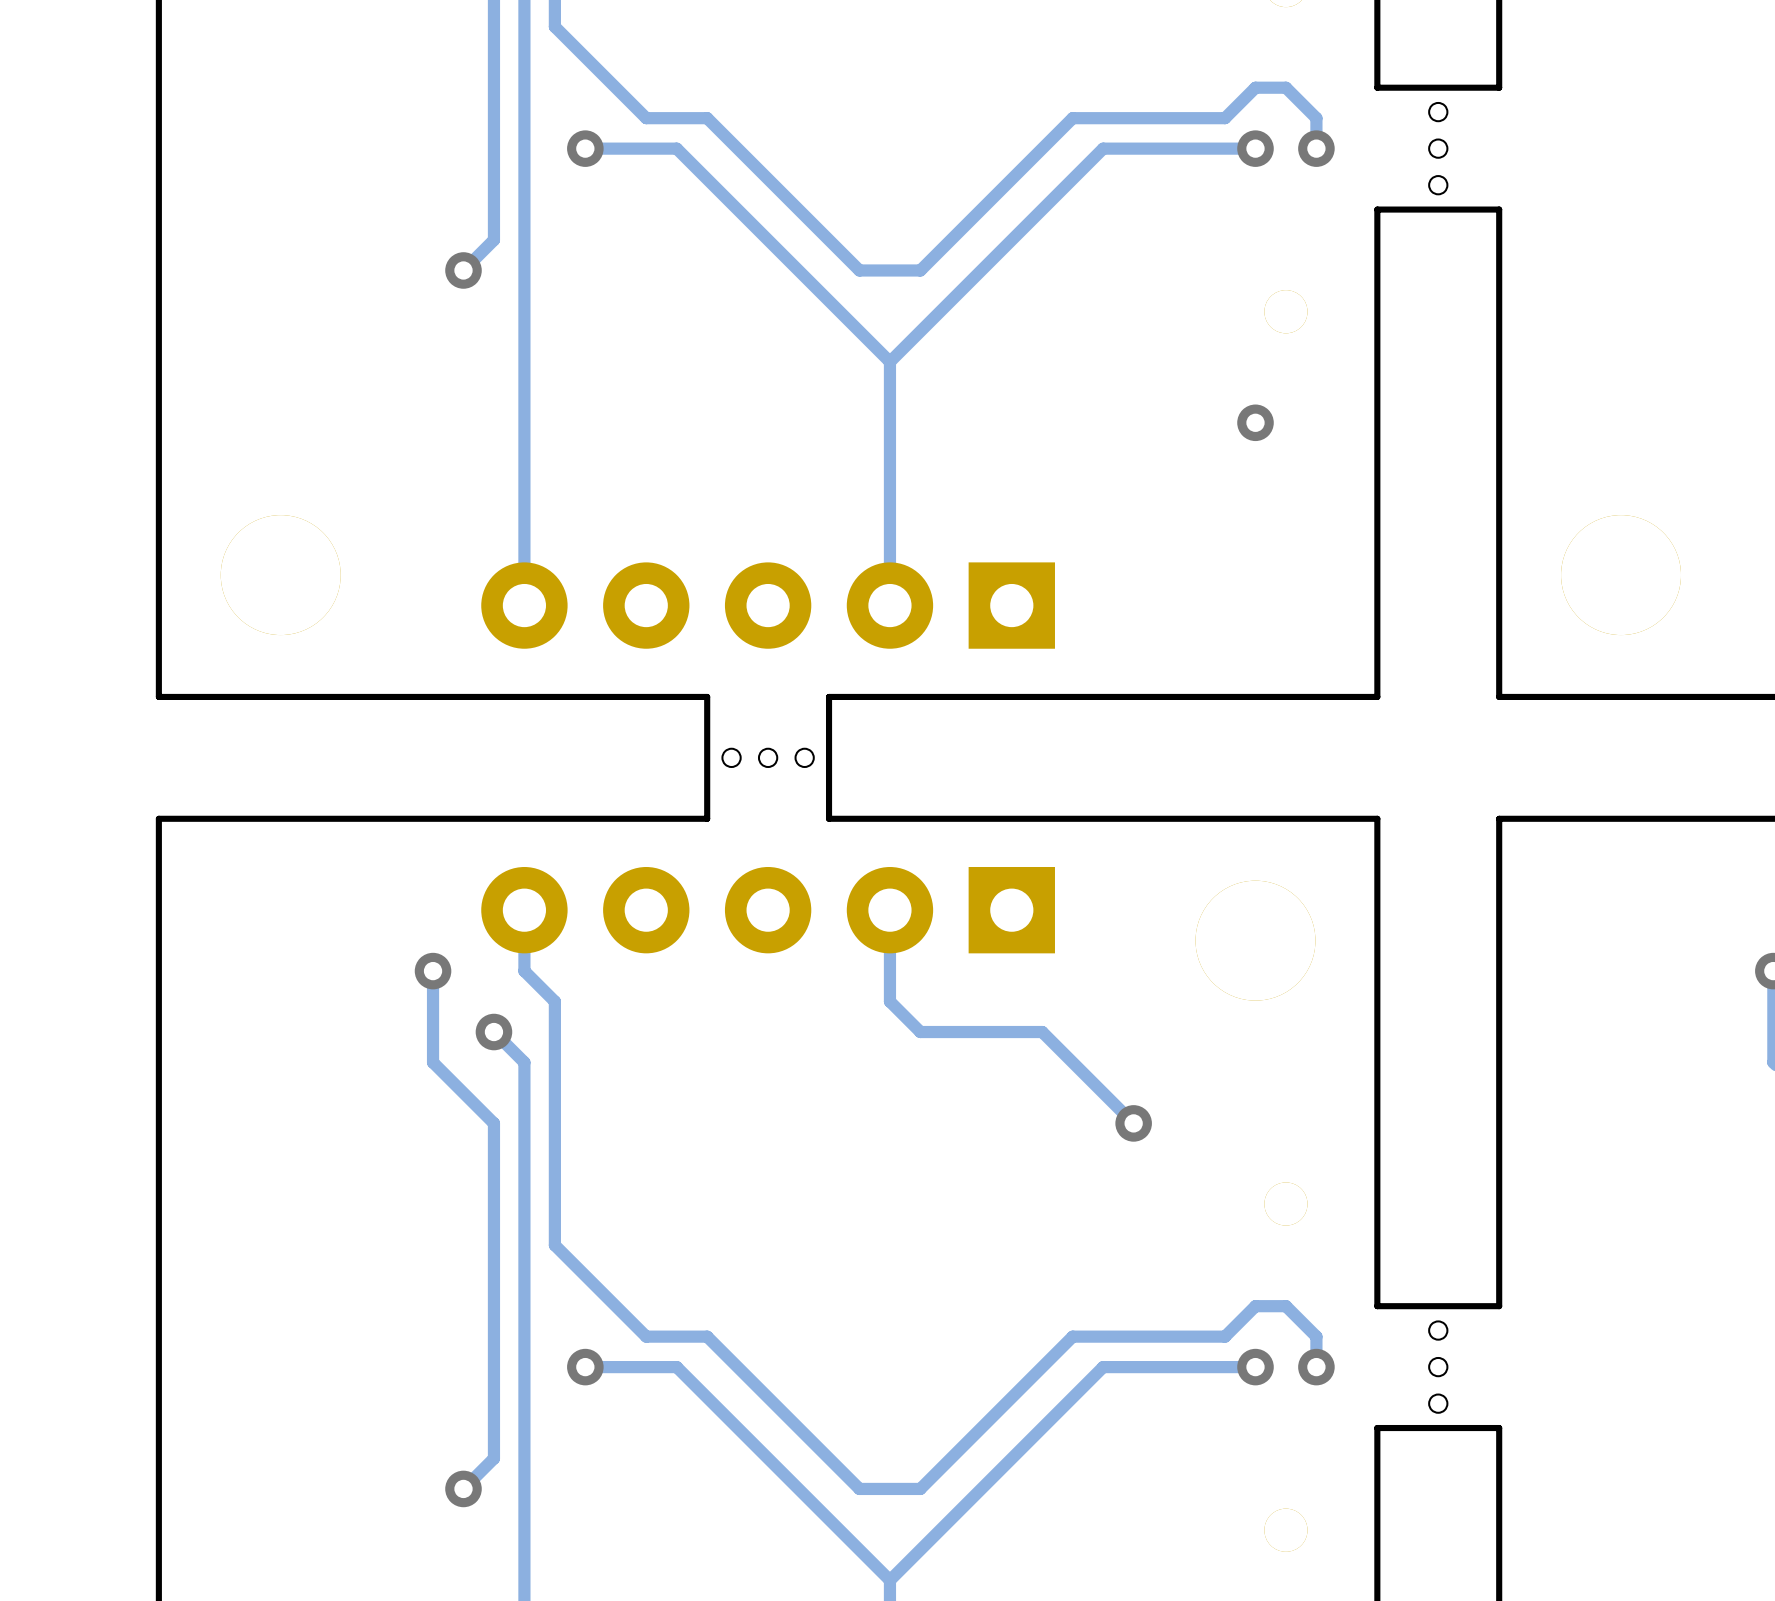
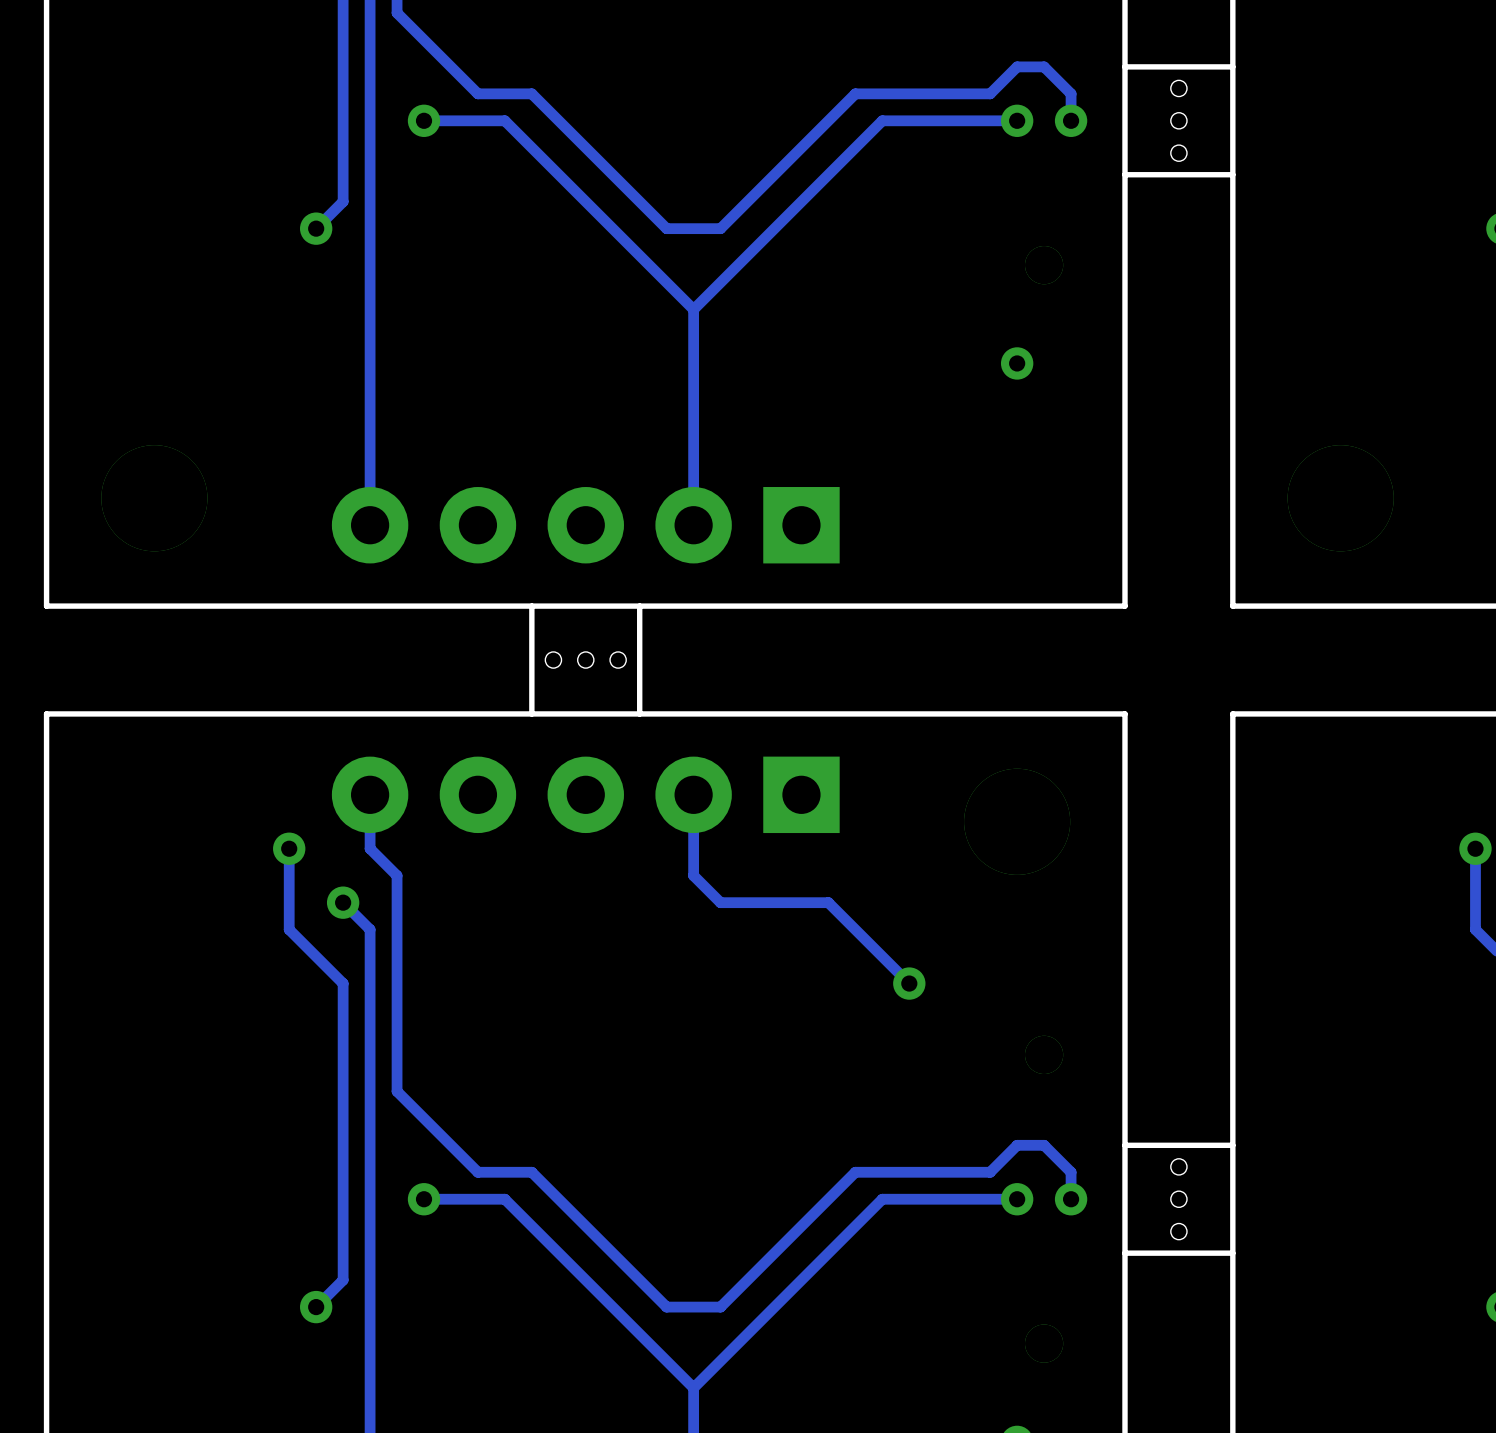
board edge: none -> (1124, 66) (1124, 174)
board edge: none -> (1232, 66) (1232, 174)
board edge: none -> (639, 606) (531, 606)
board edge: none -> (639, 713) (531, 713)
board edge: none -> (1124, 1145) (1124, 1253)
board edge: none -> (1232, 1145) (1232, 1253)

